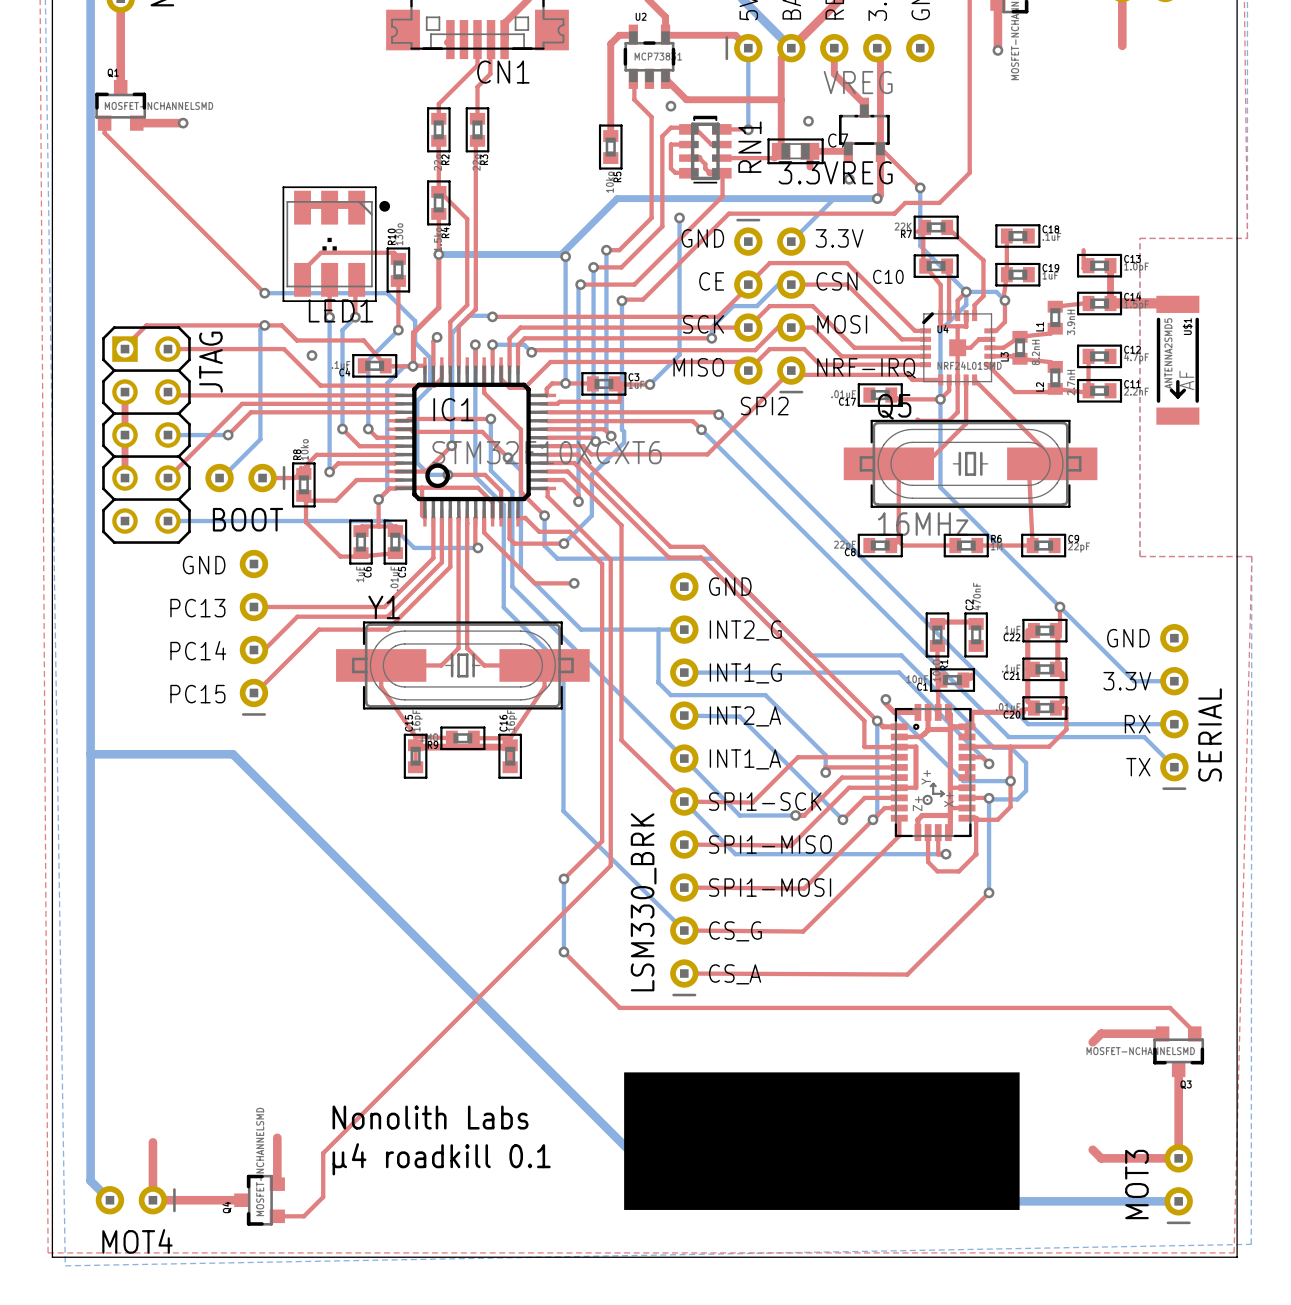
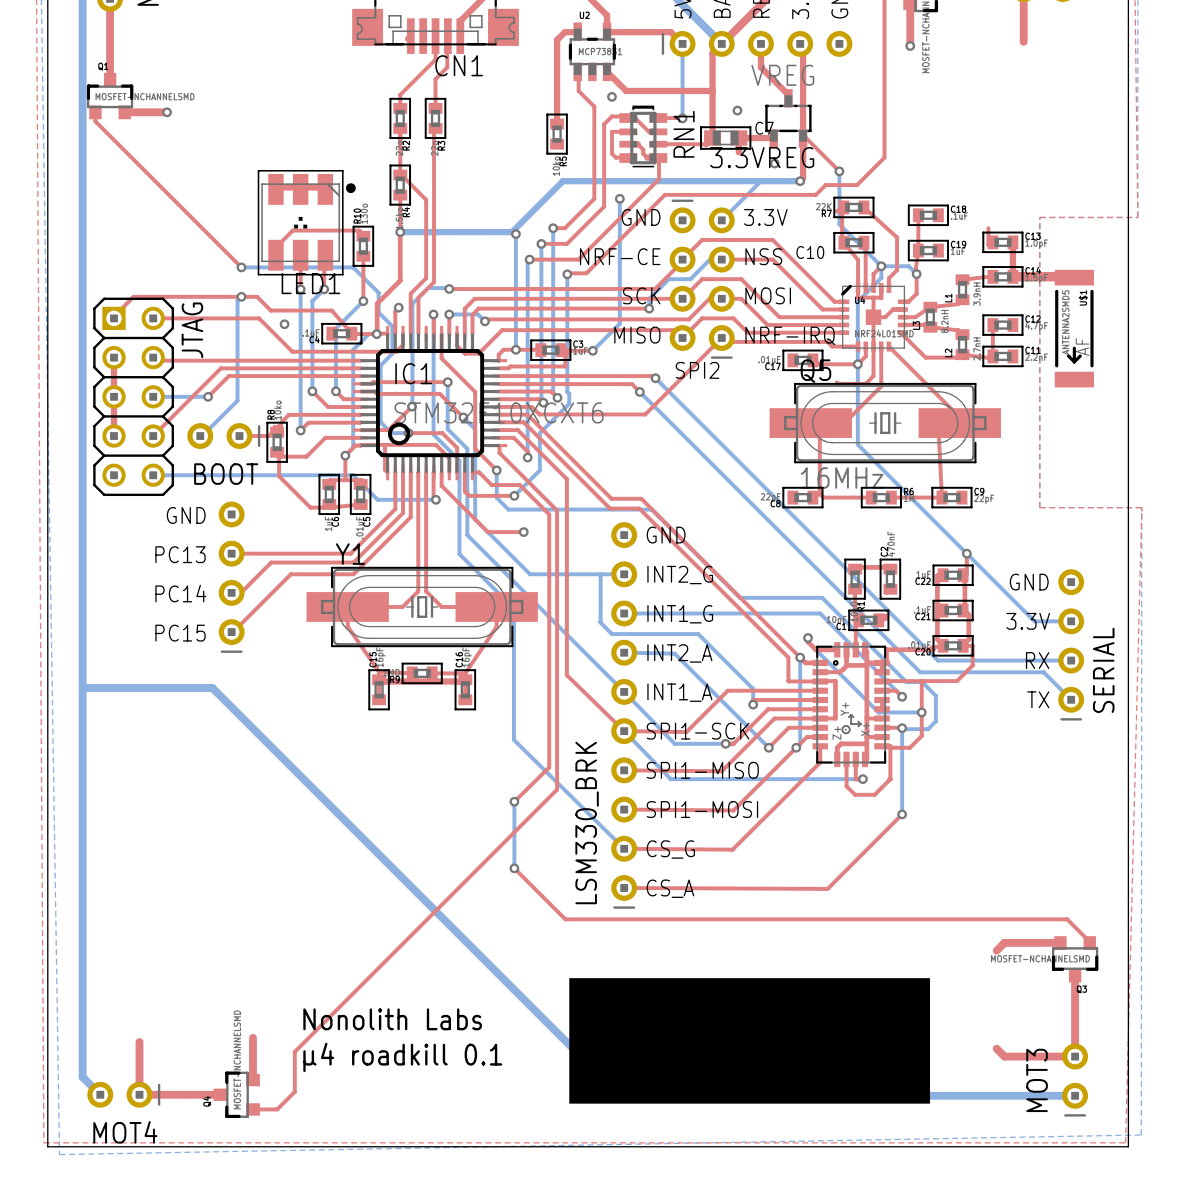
text: CE (711, 281) -> NRF-CE (620, 256)
text: CSN (837, 281) -> NSS (763, 256)

